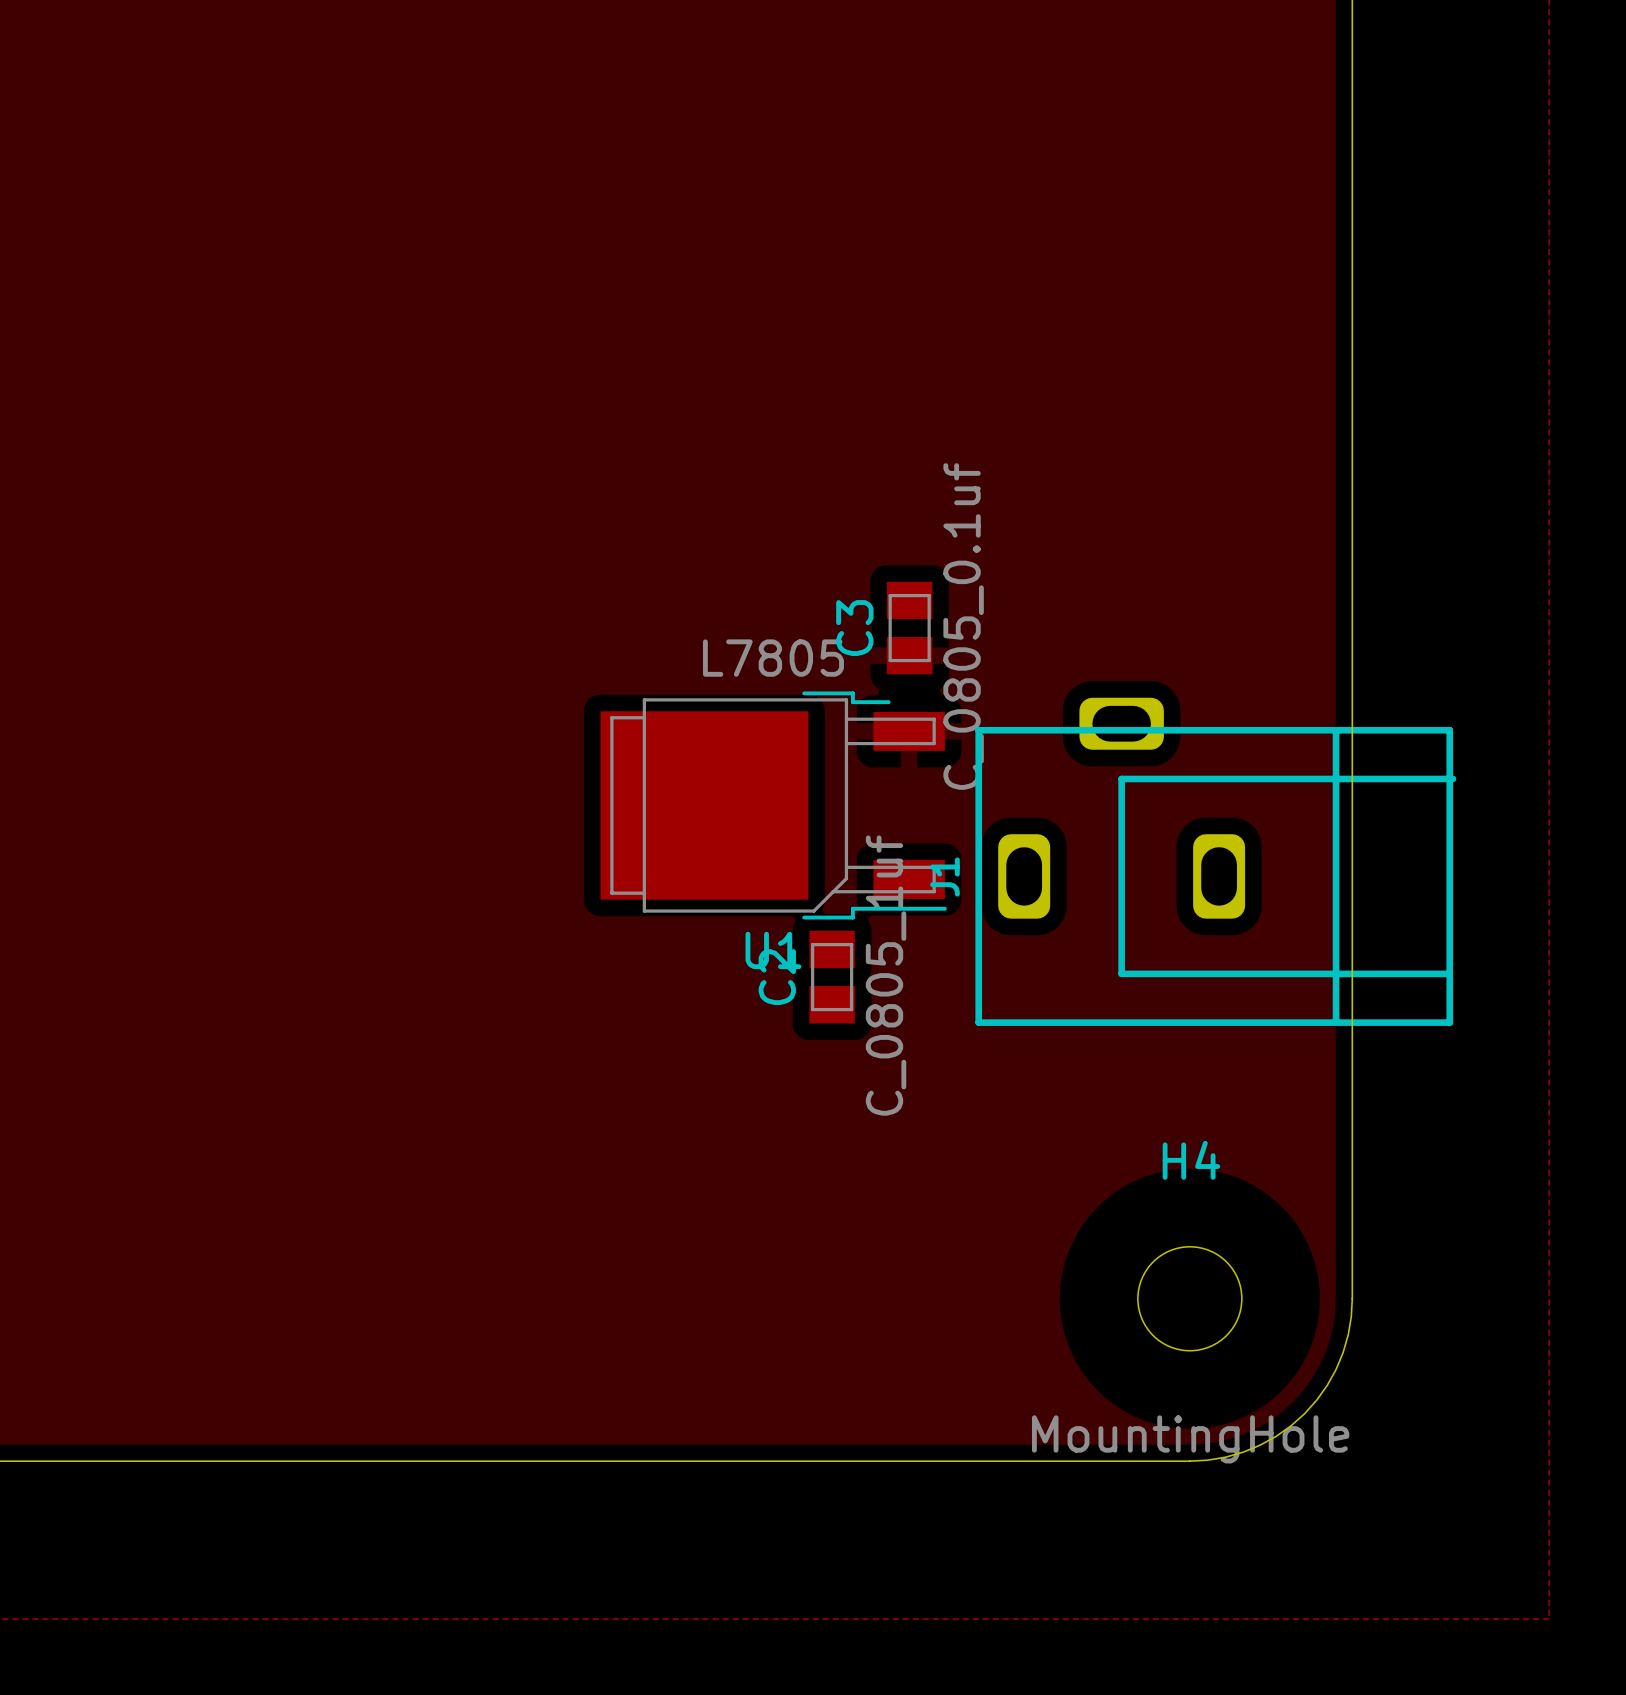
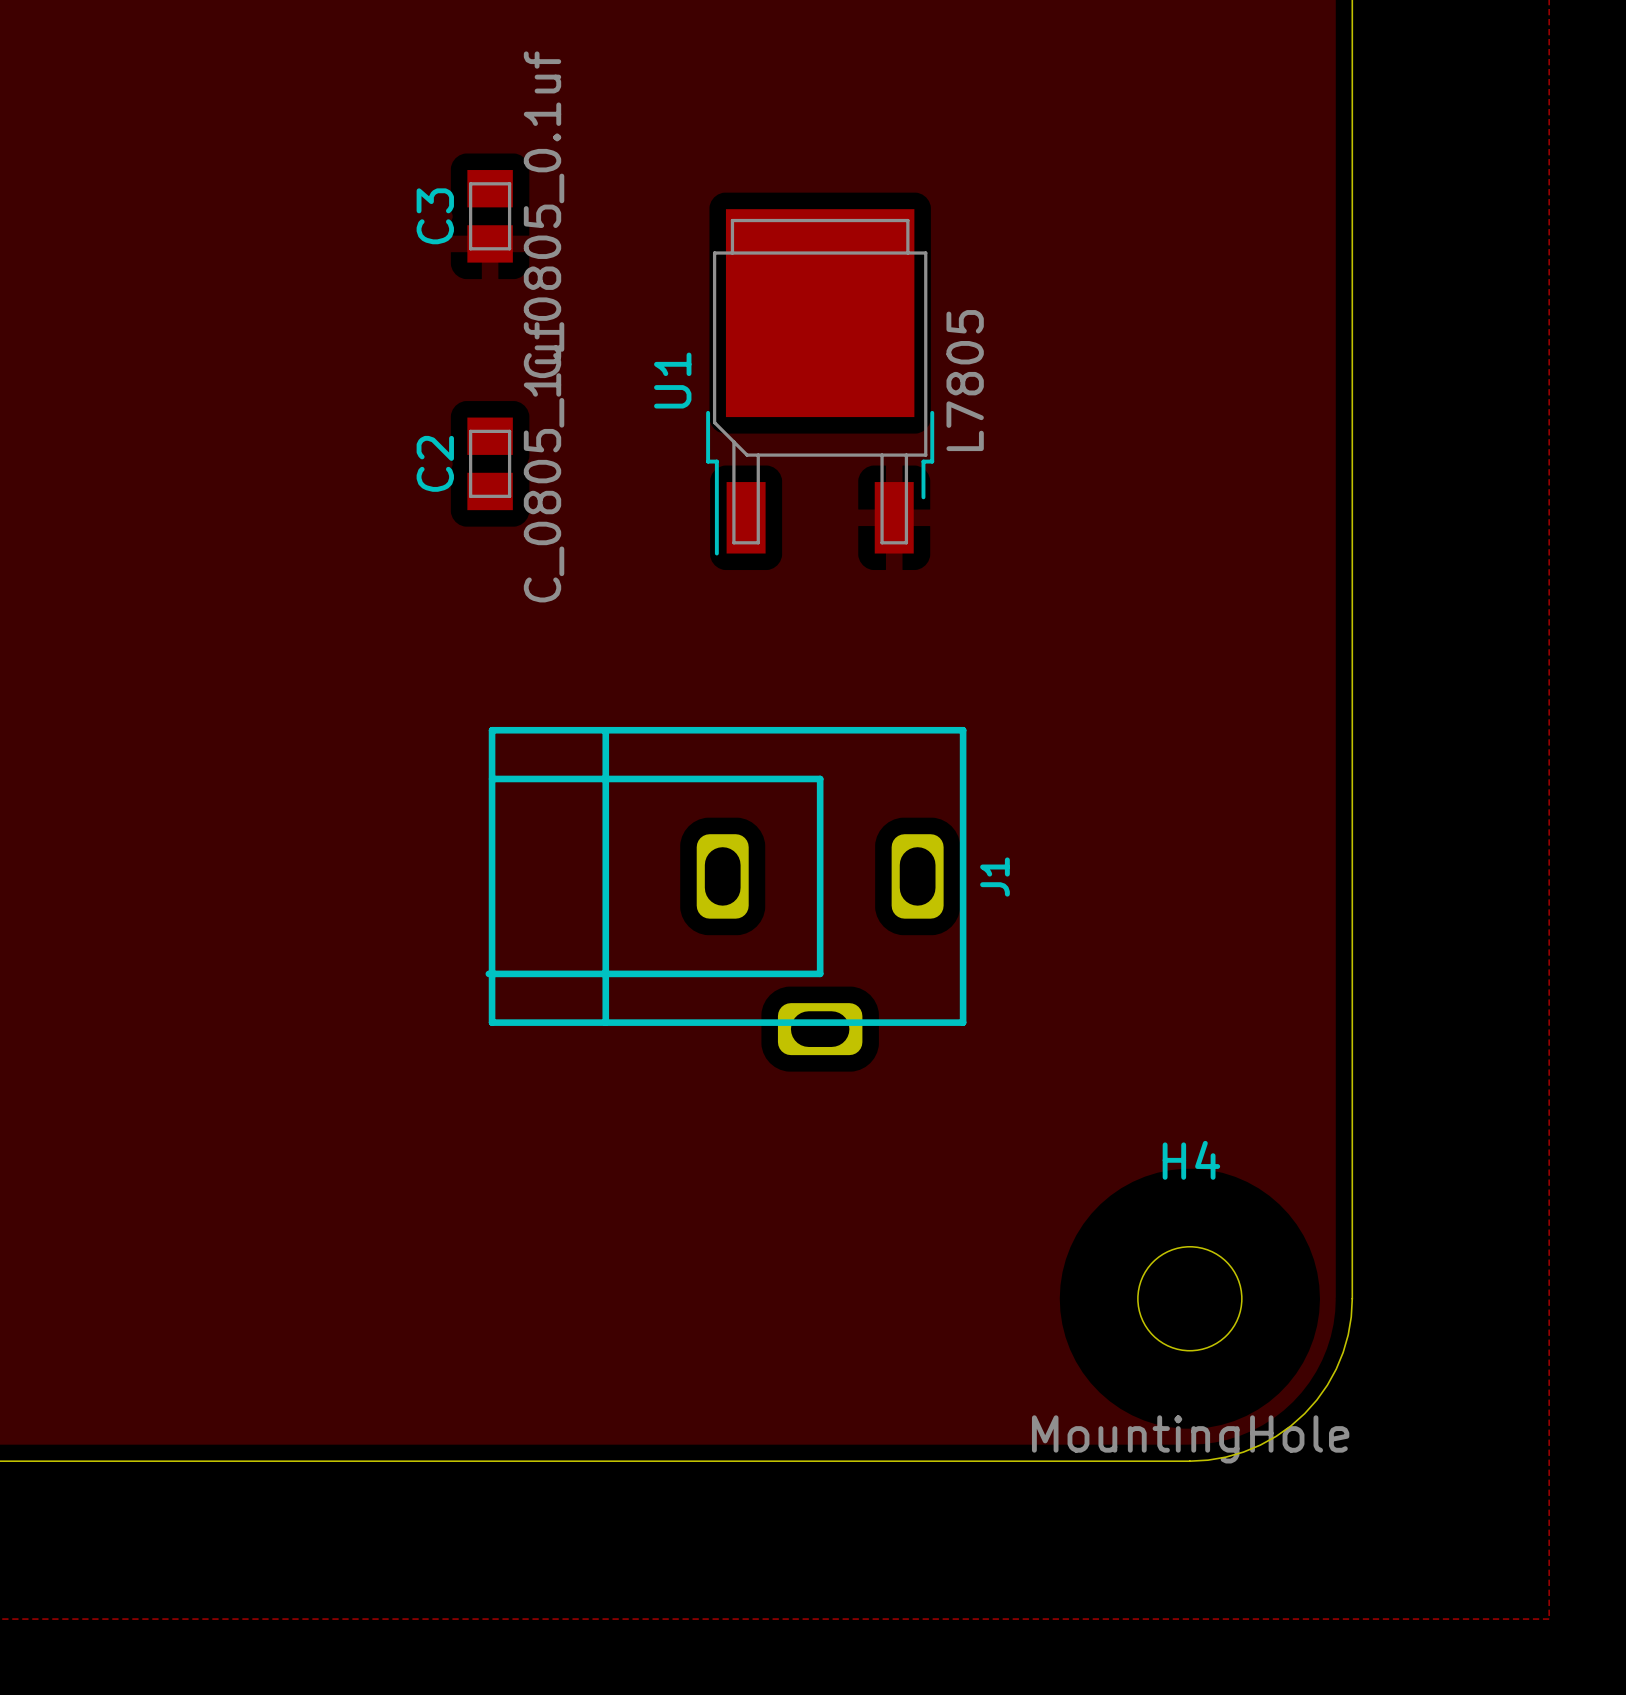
C3 position: (909, 628) -> (490, 216)
U1 rotation: 0° (773, 805) -> 90° clockwise (820, 382)
U1 position: (773, 805) -> (820, 382)
J1 rotation: 0° (1215, 861) -> 180° (725, 891)
J1 position: (1215, 861) -> (725, 891)
C2 position: (832, 977) -> (490, 463)

